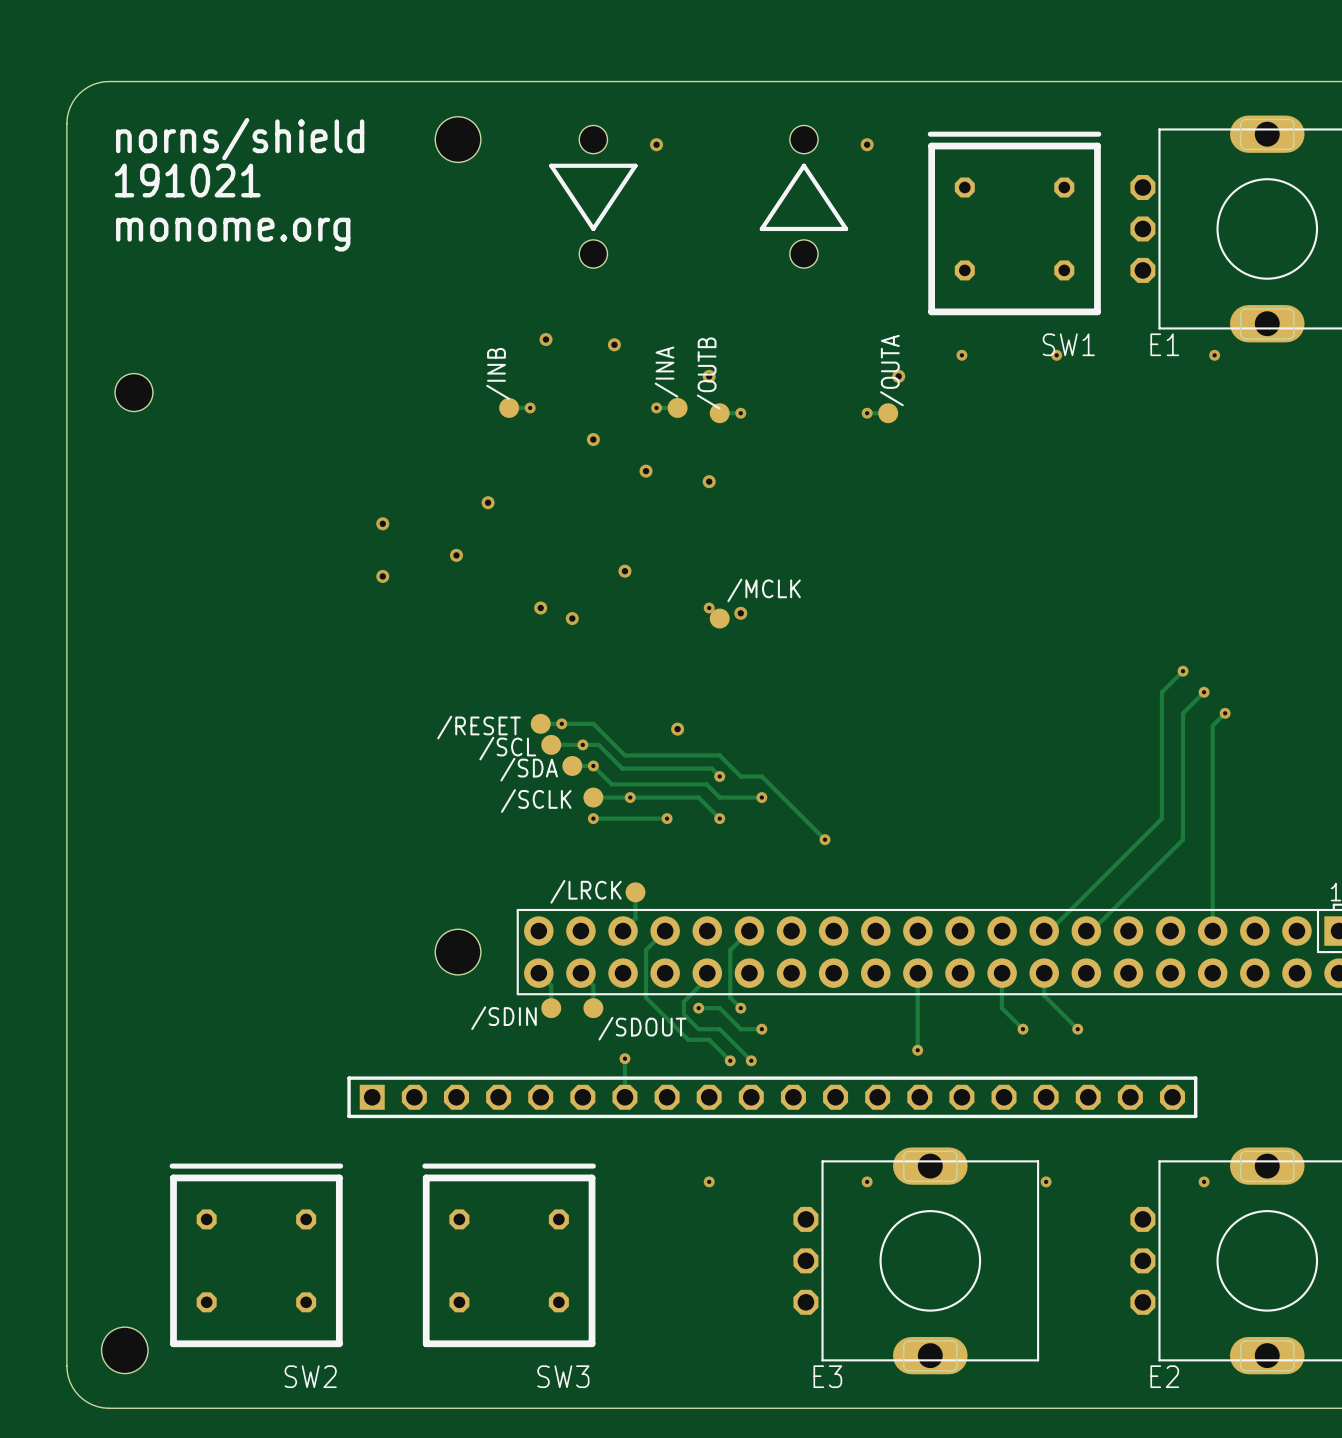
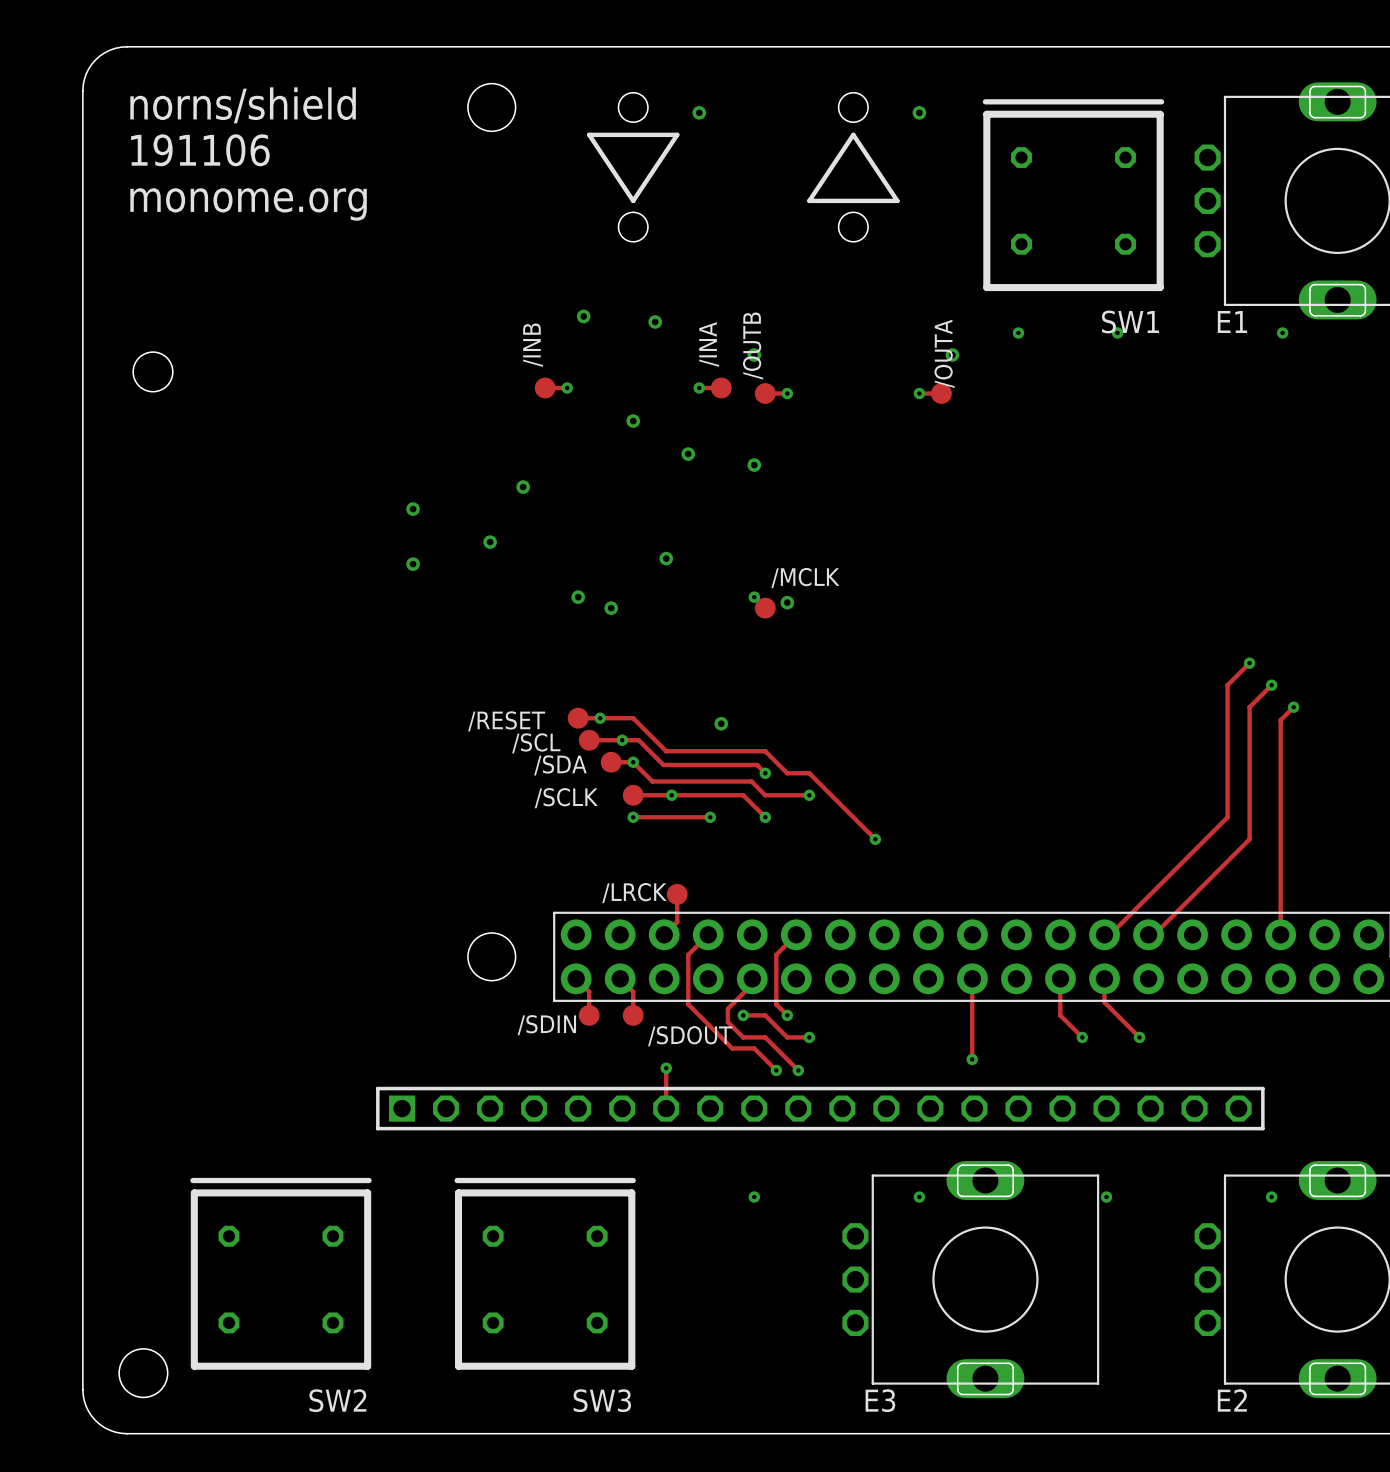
text: 191021 (187, 180) -> 191106 (200, 150)

